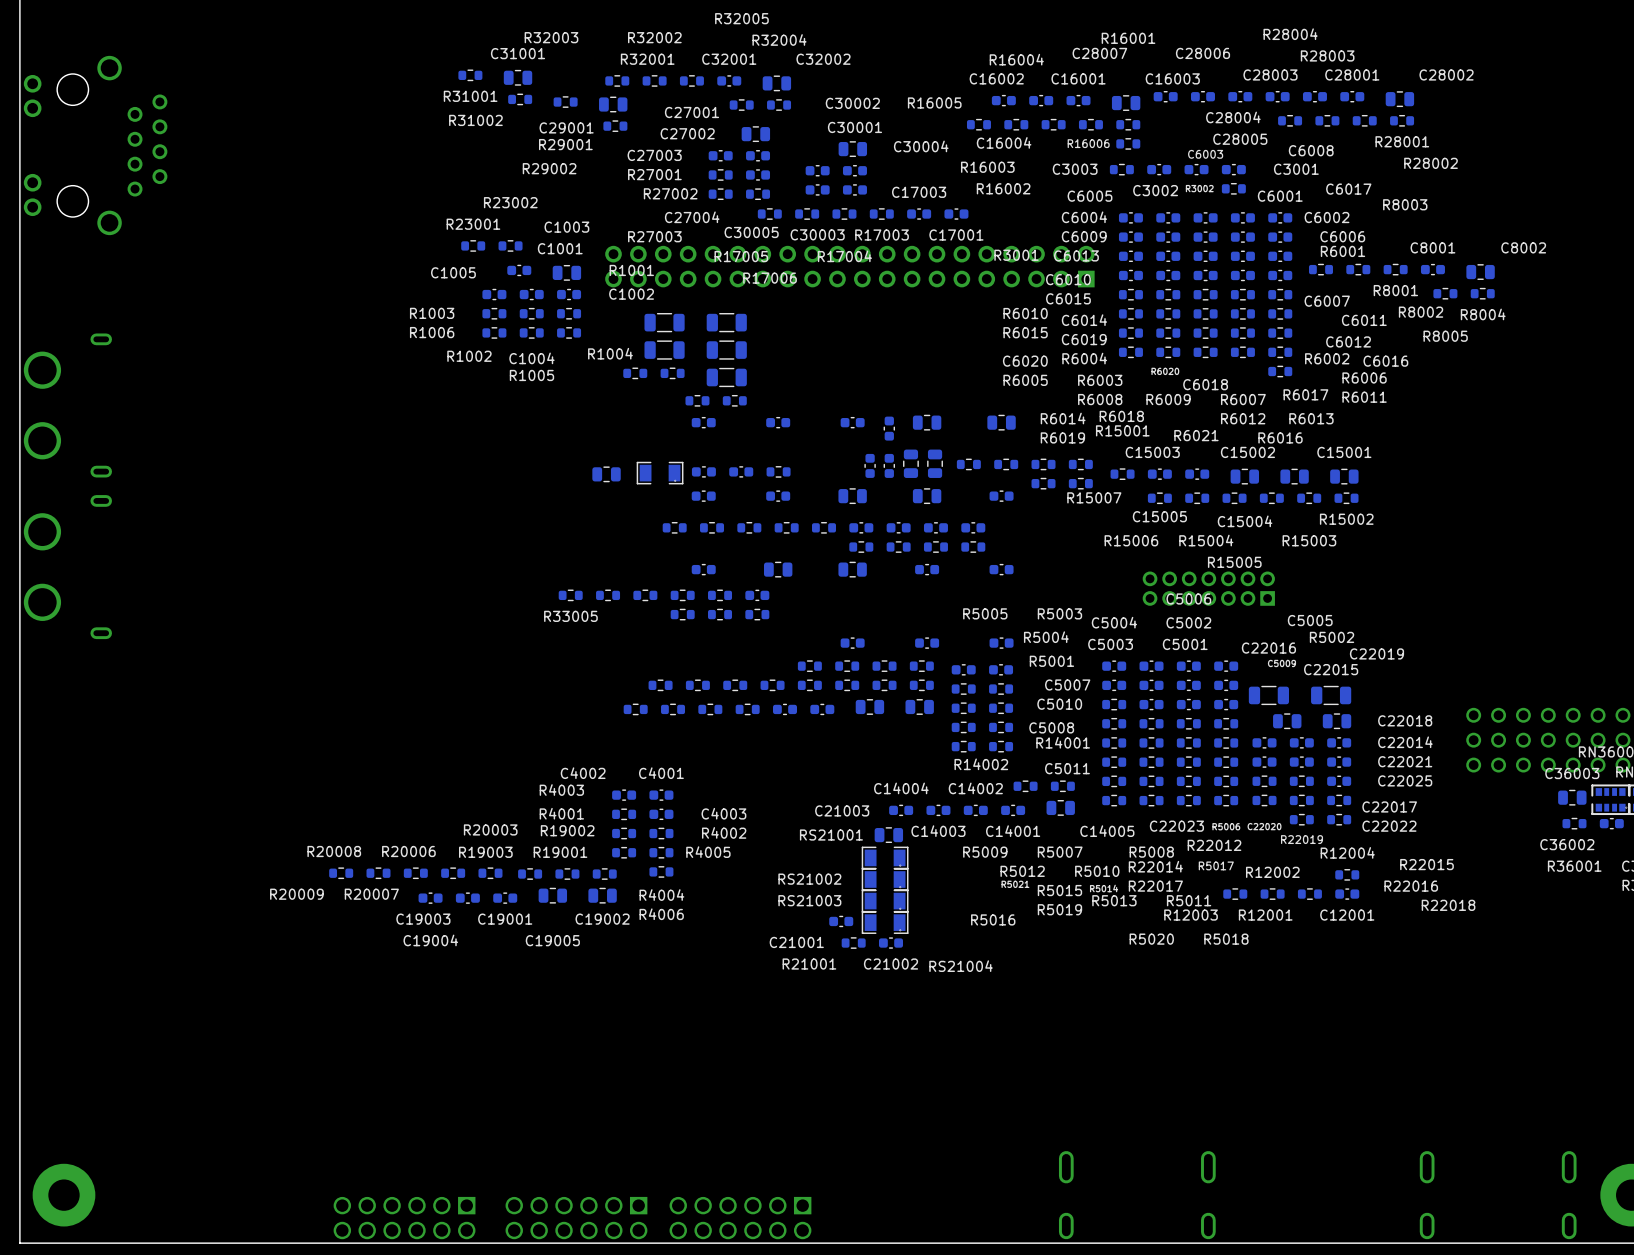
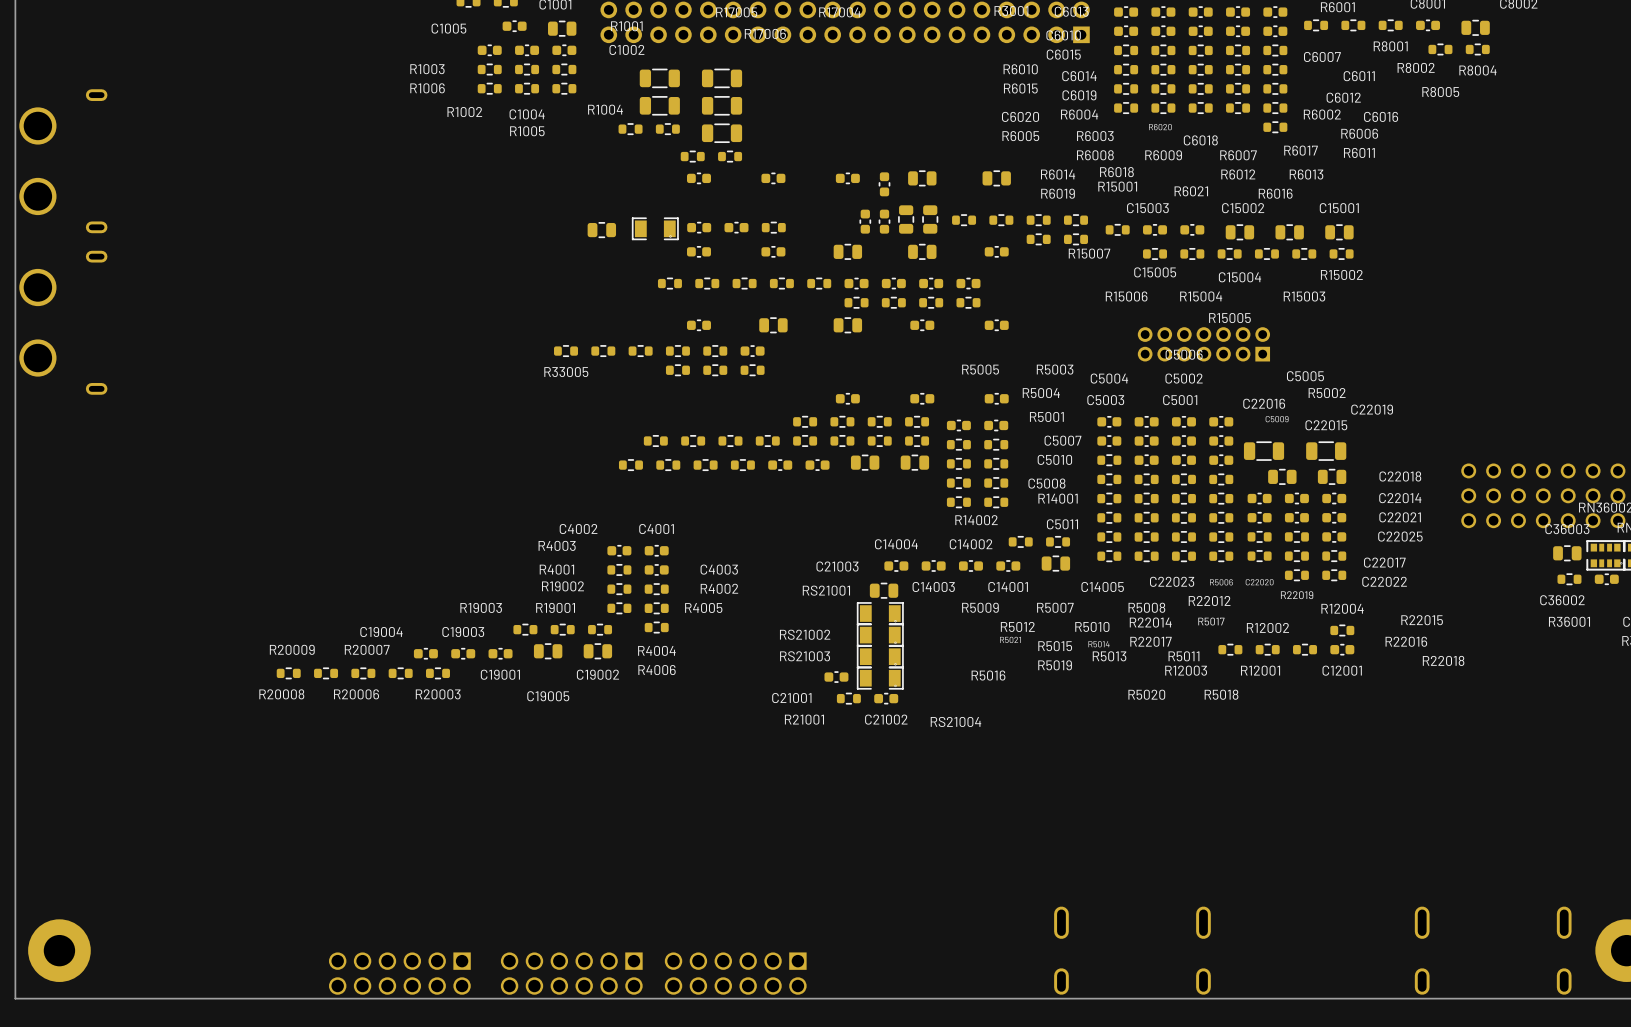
R20003 name position: R20003 (490, 829) -> R20003 (438, 694)
R20008 name position: R20008 (334, 851) -> R20008 (281, 694)
R20006 name position: R20006 (408, 851) -> R20006 (356, 694)
R20009 position: (341, 873) -> (288, 673)
R20008 position: (378, 873) -> (326, 673)
R20007 position: (415, 873) -> (363, 673)
R20006 position: (453, 873) -> (400, 673)
R20003 position: (490, 873) -> (437, 673)
C19003 name position: C19003 (423, 919) -> C19003 (463, 632)
C19004 name position: C19004 (430, 940) -> C19004 (381, 632)

